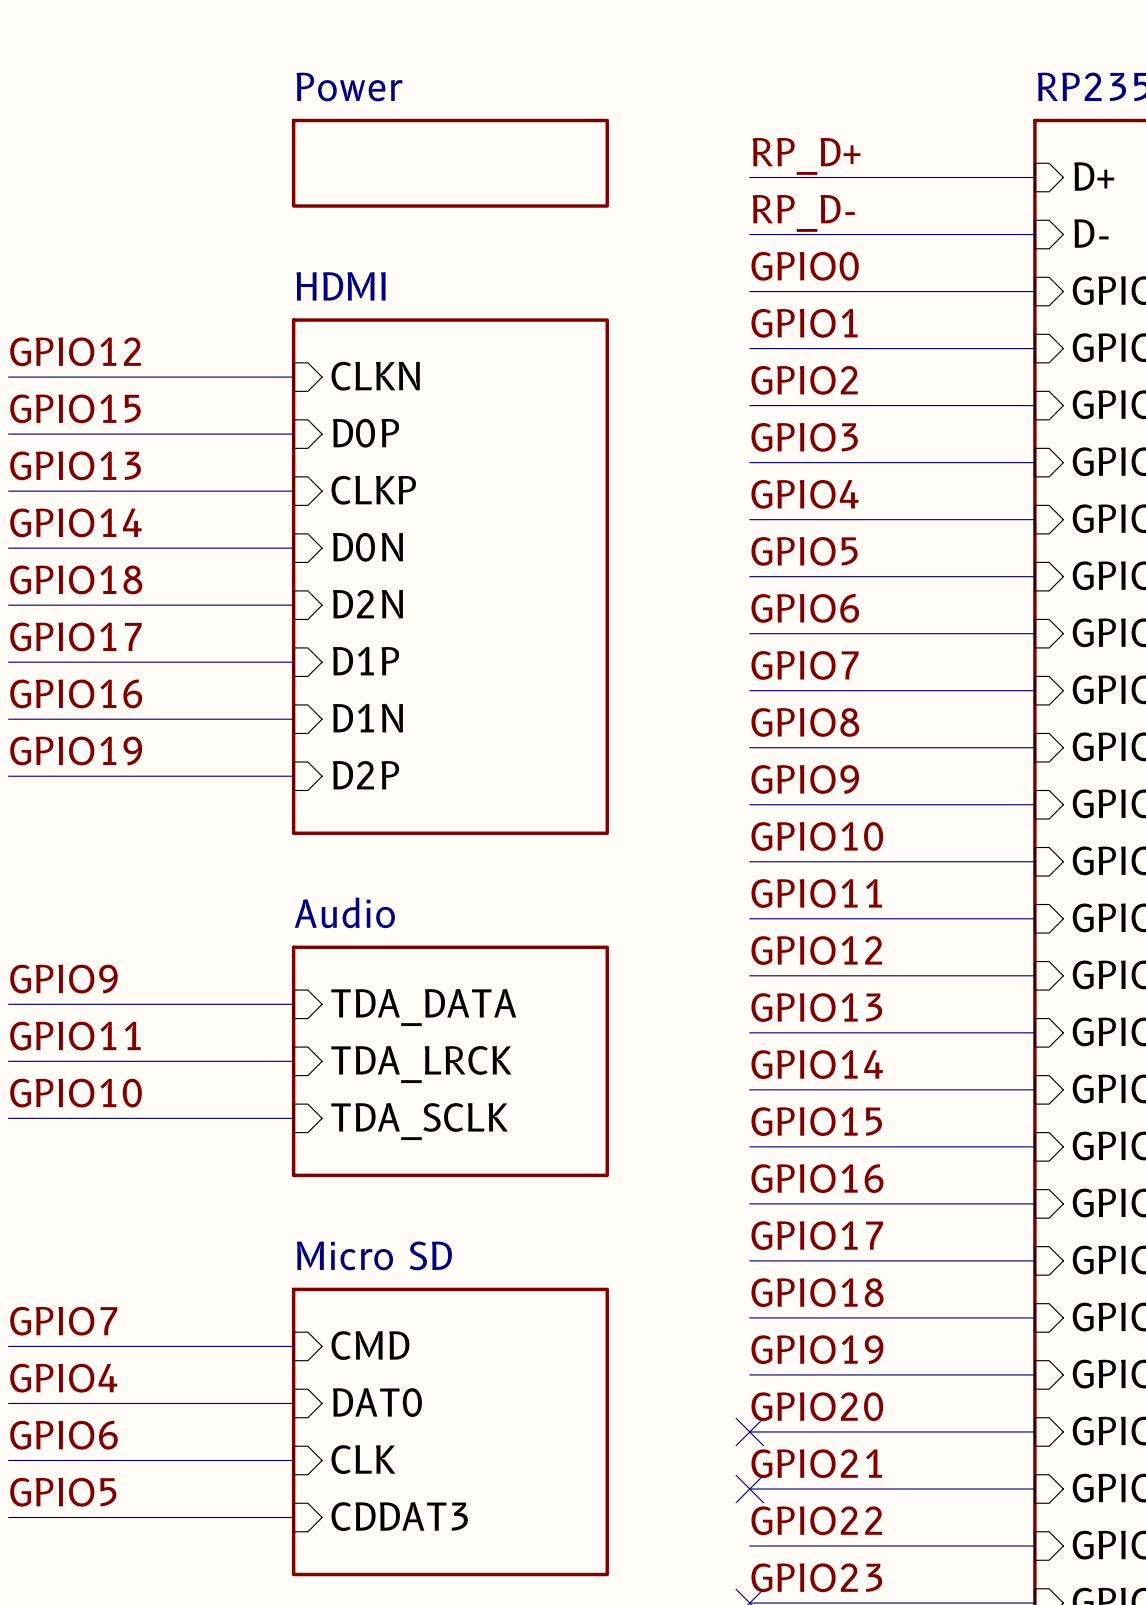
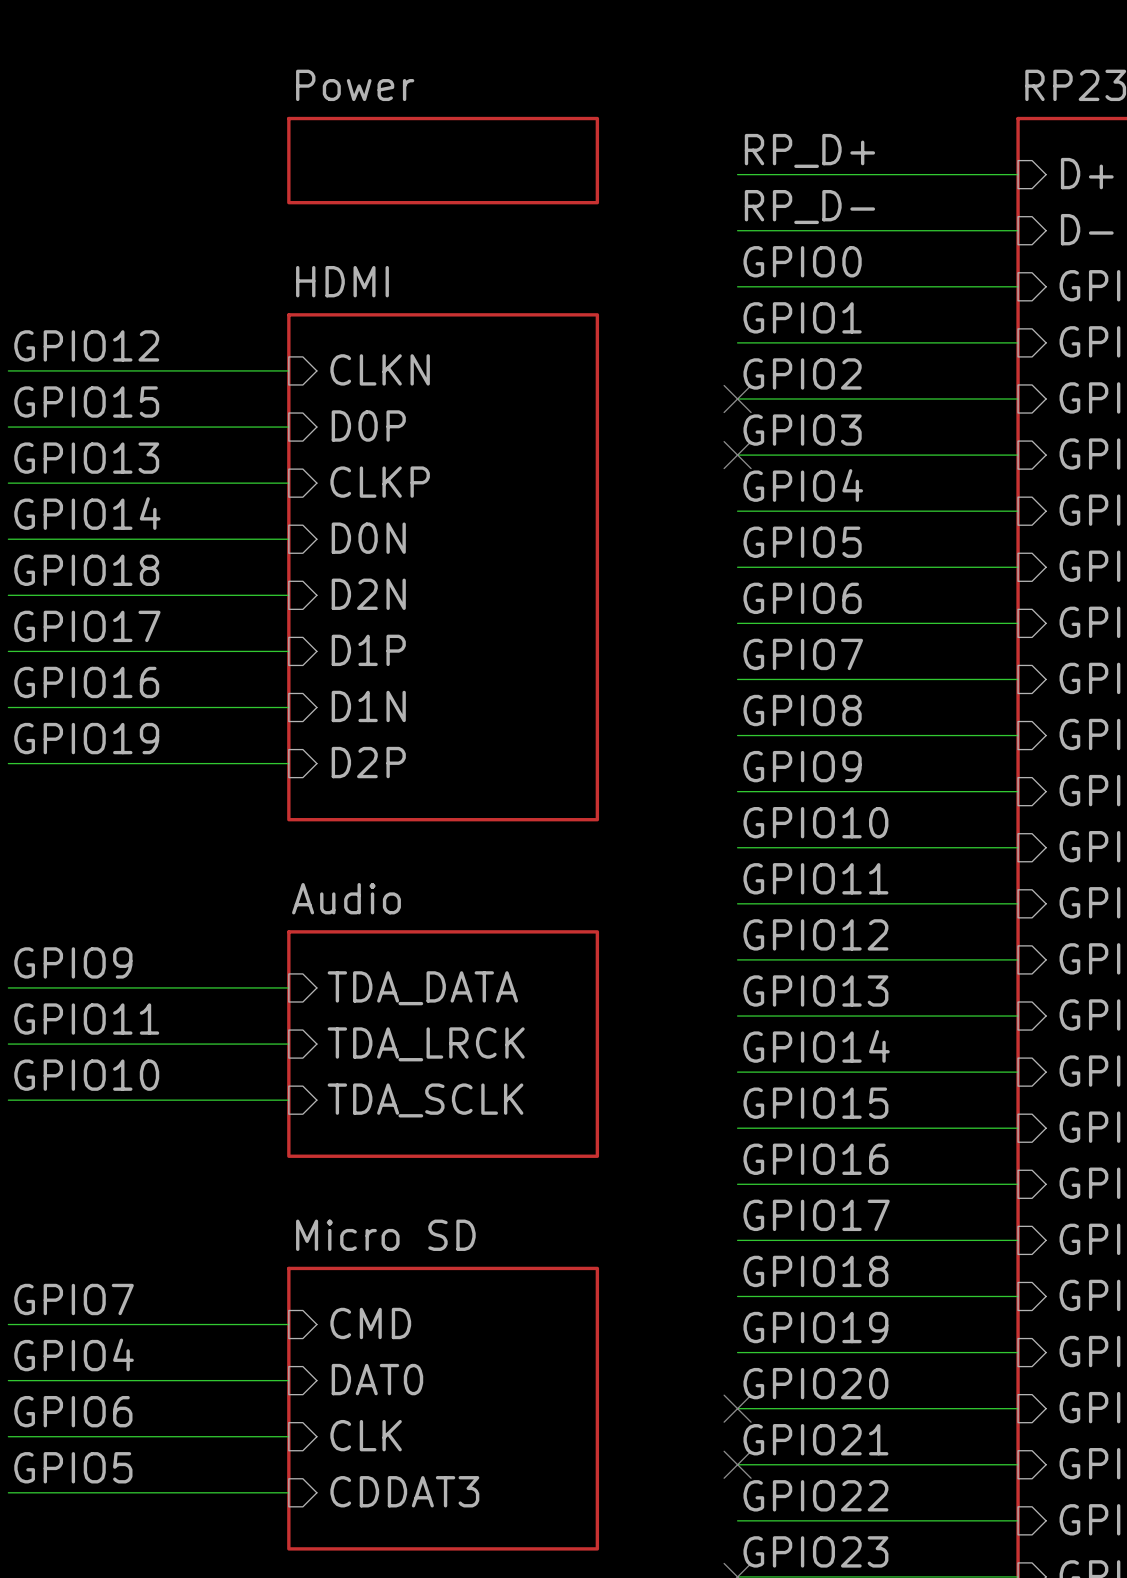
no-connect mark: none -> (737, 398)
no-connect mark: none -> (737, 455)

